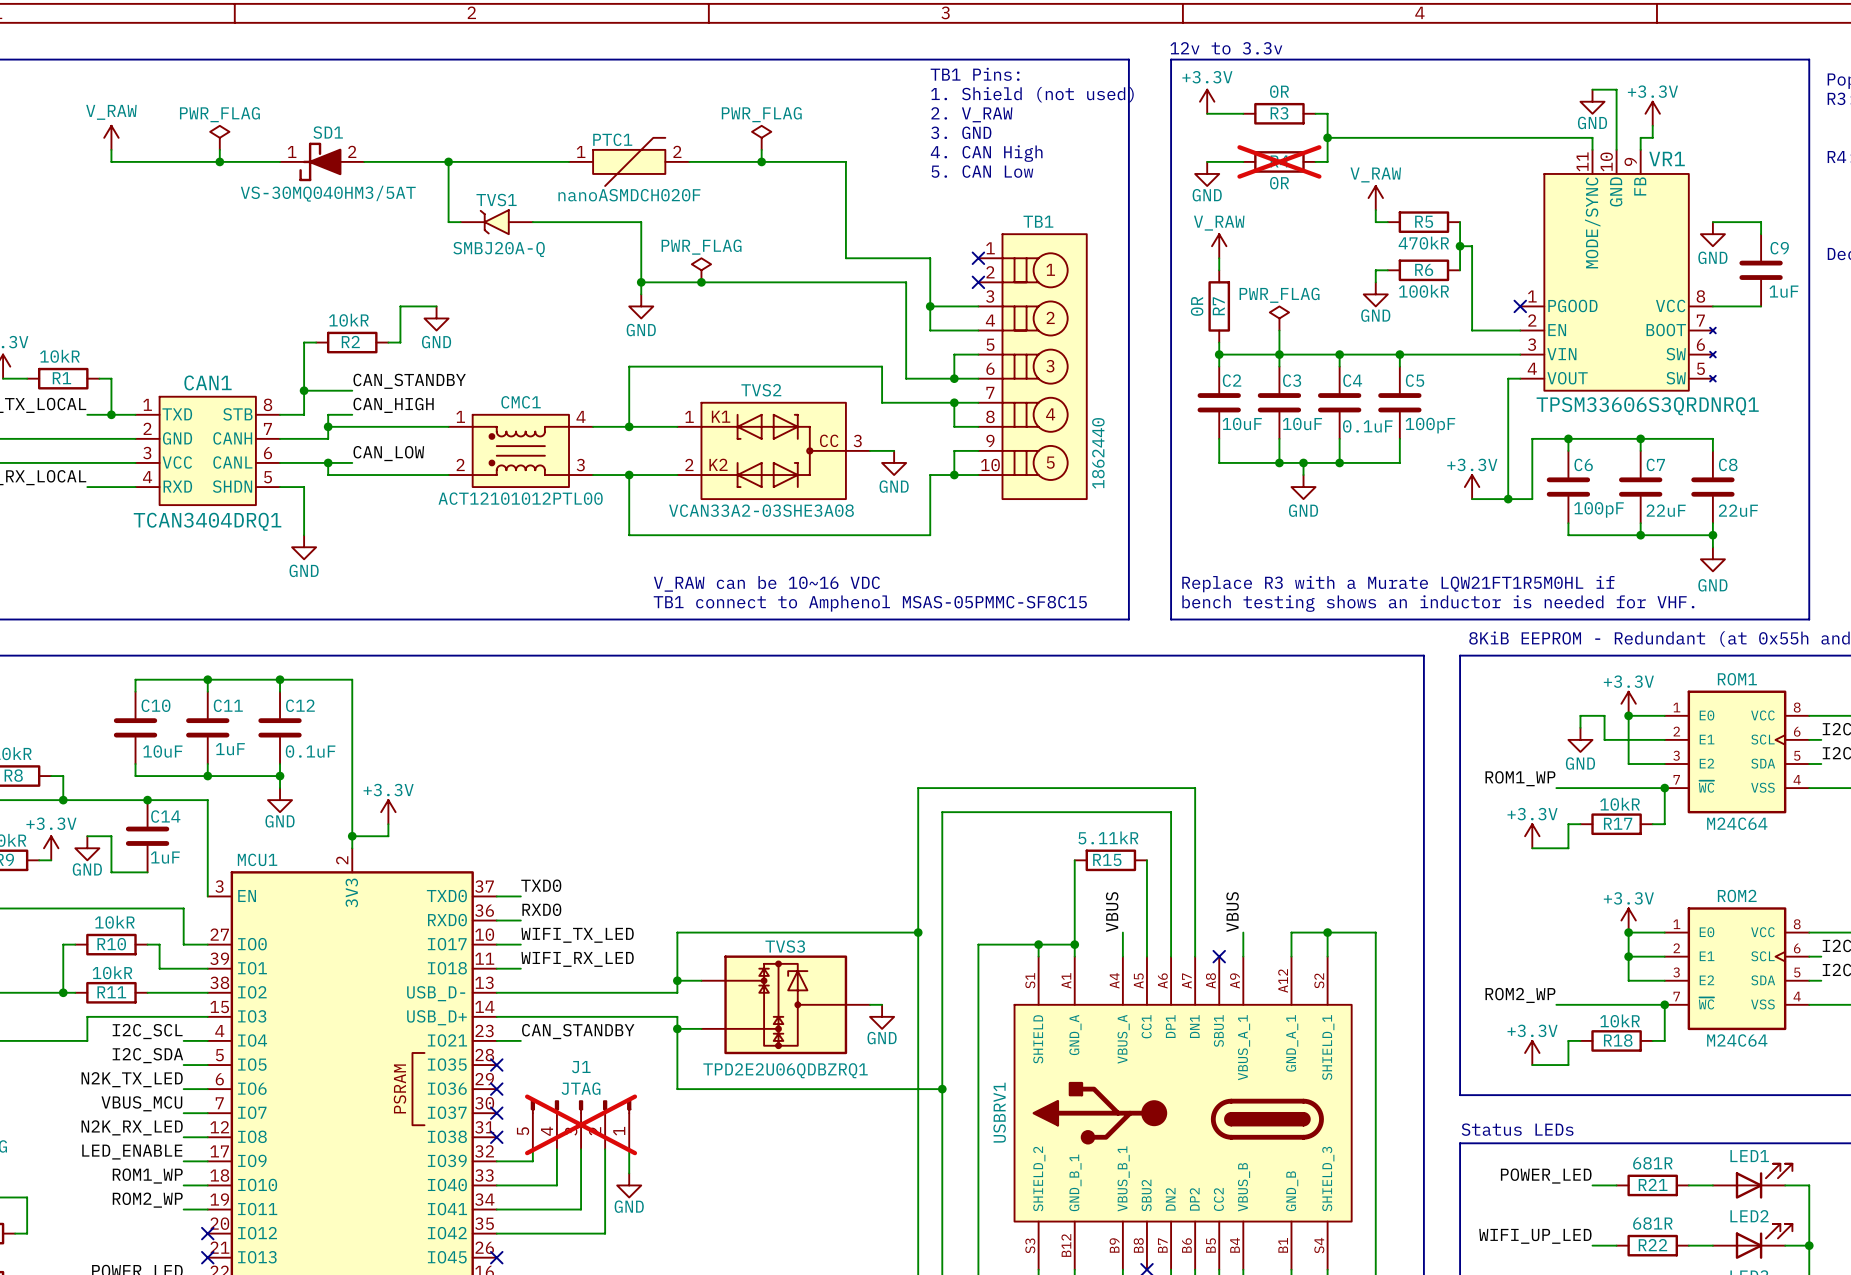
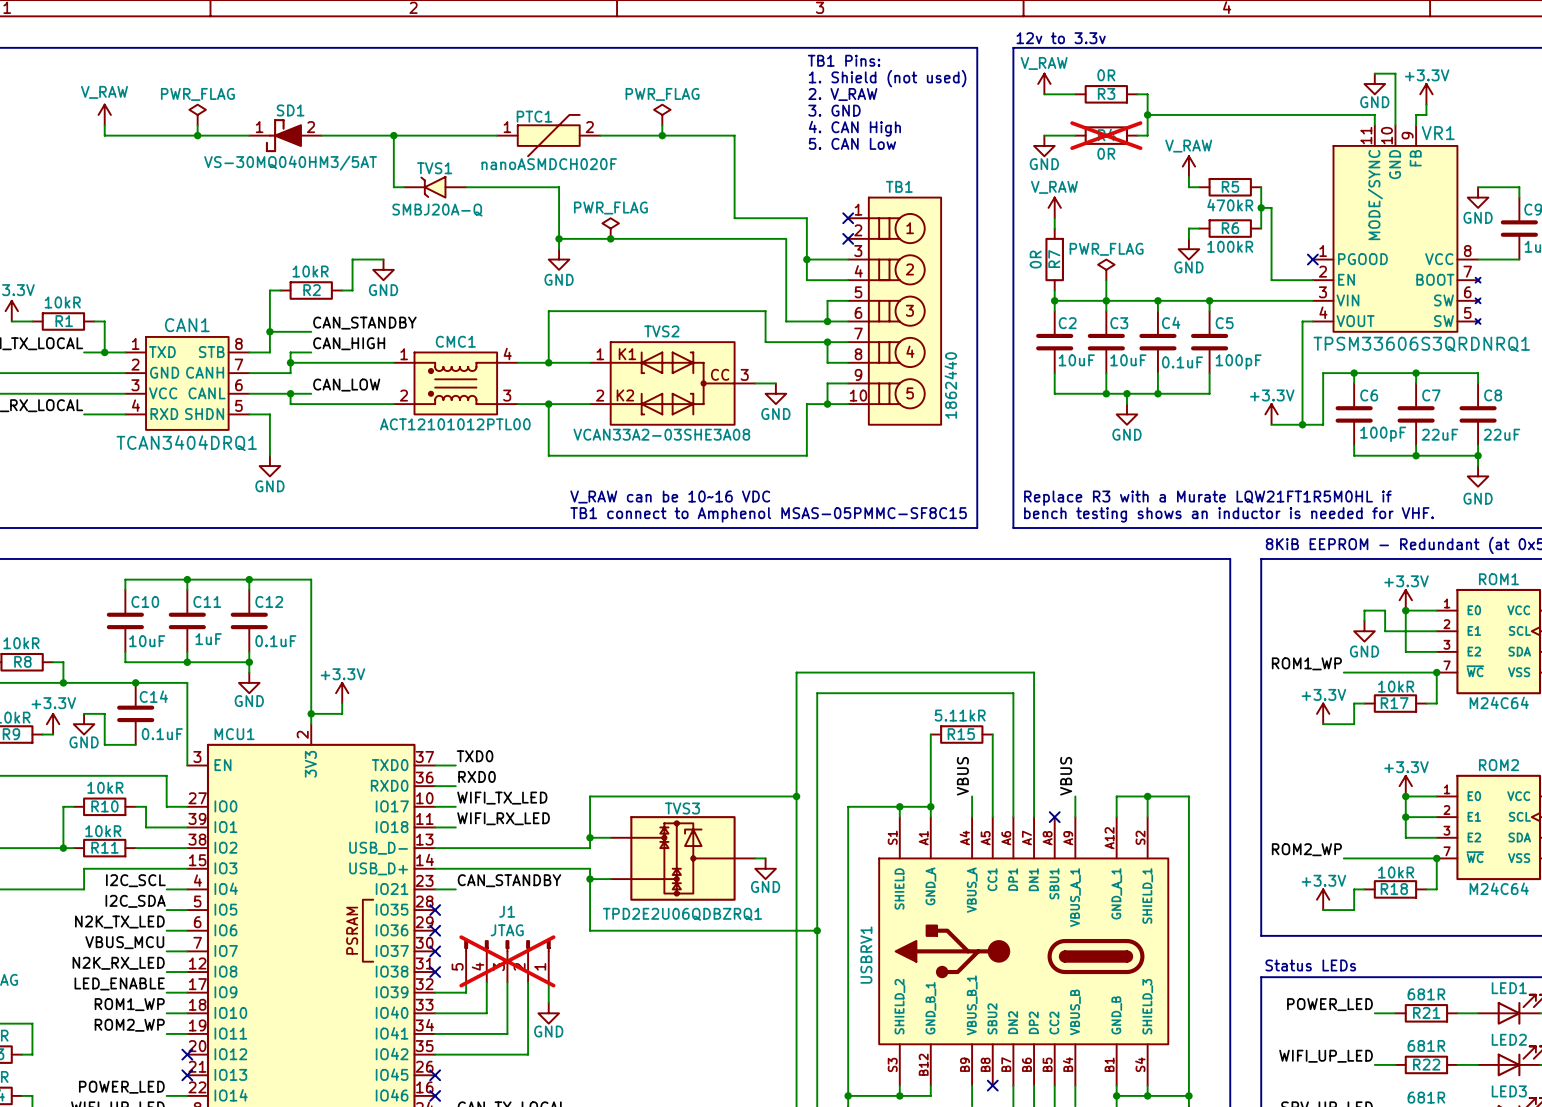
power symbol: +3.3V (1207, 101) -> V_RAW (1044, 83)
C14 value: 1uF (165, 857) -> 0.1uF (162, 734)

